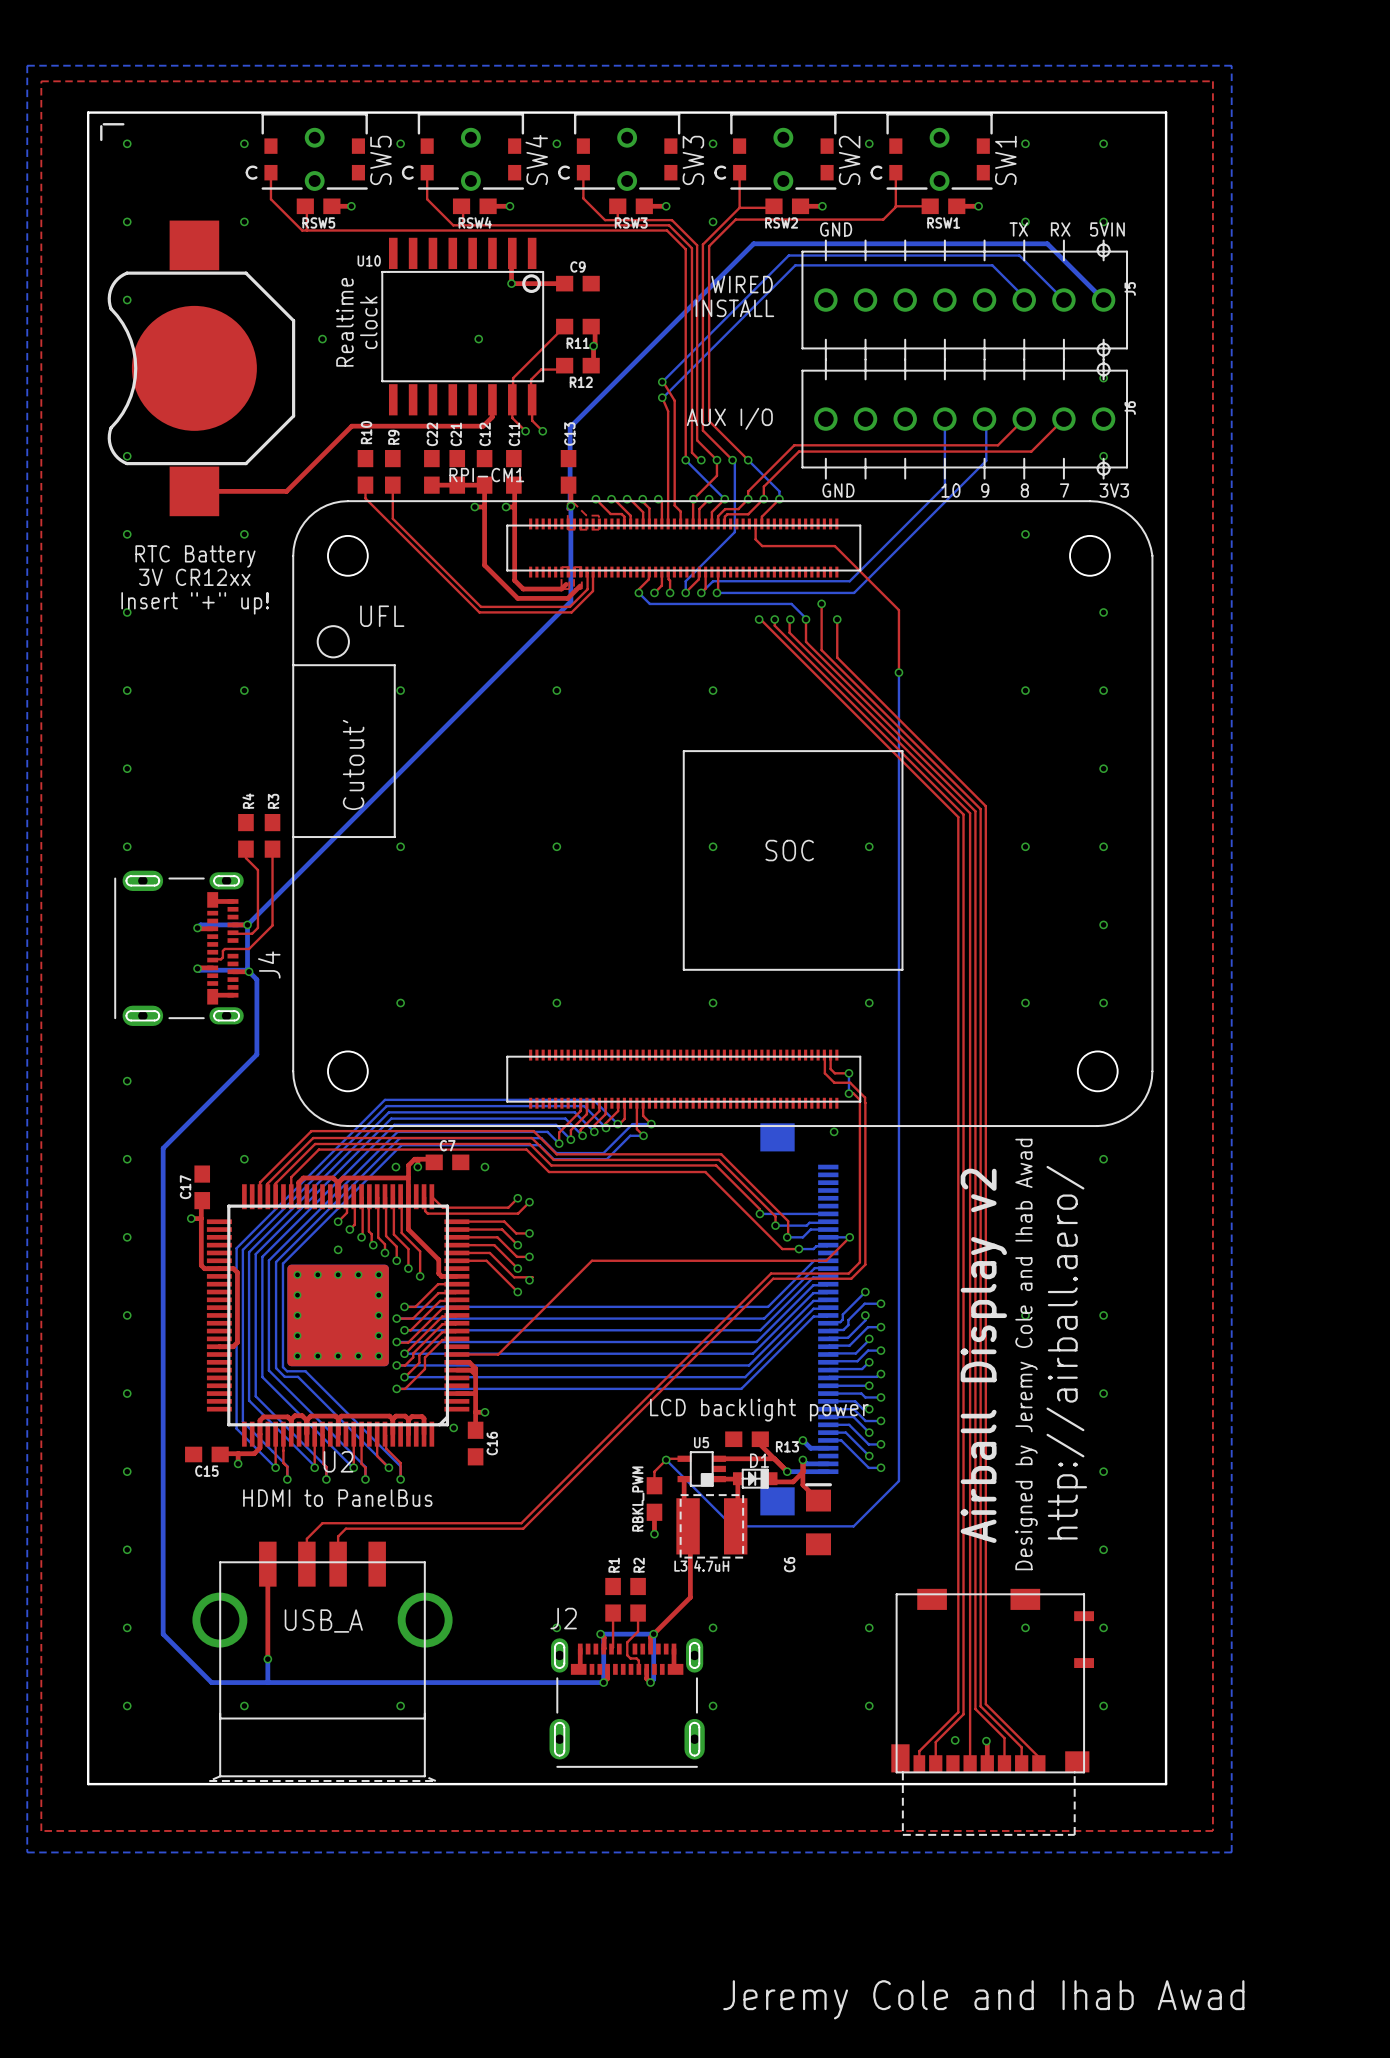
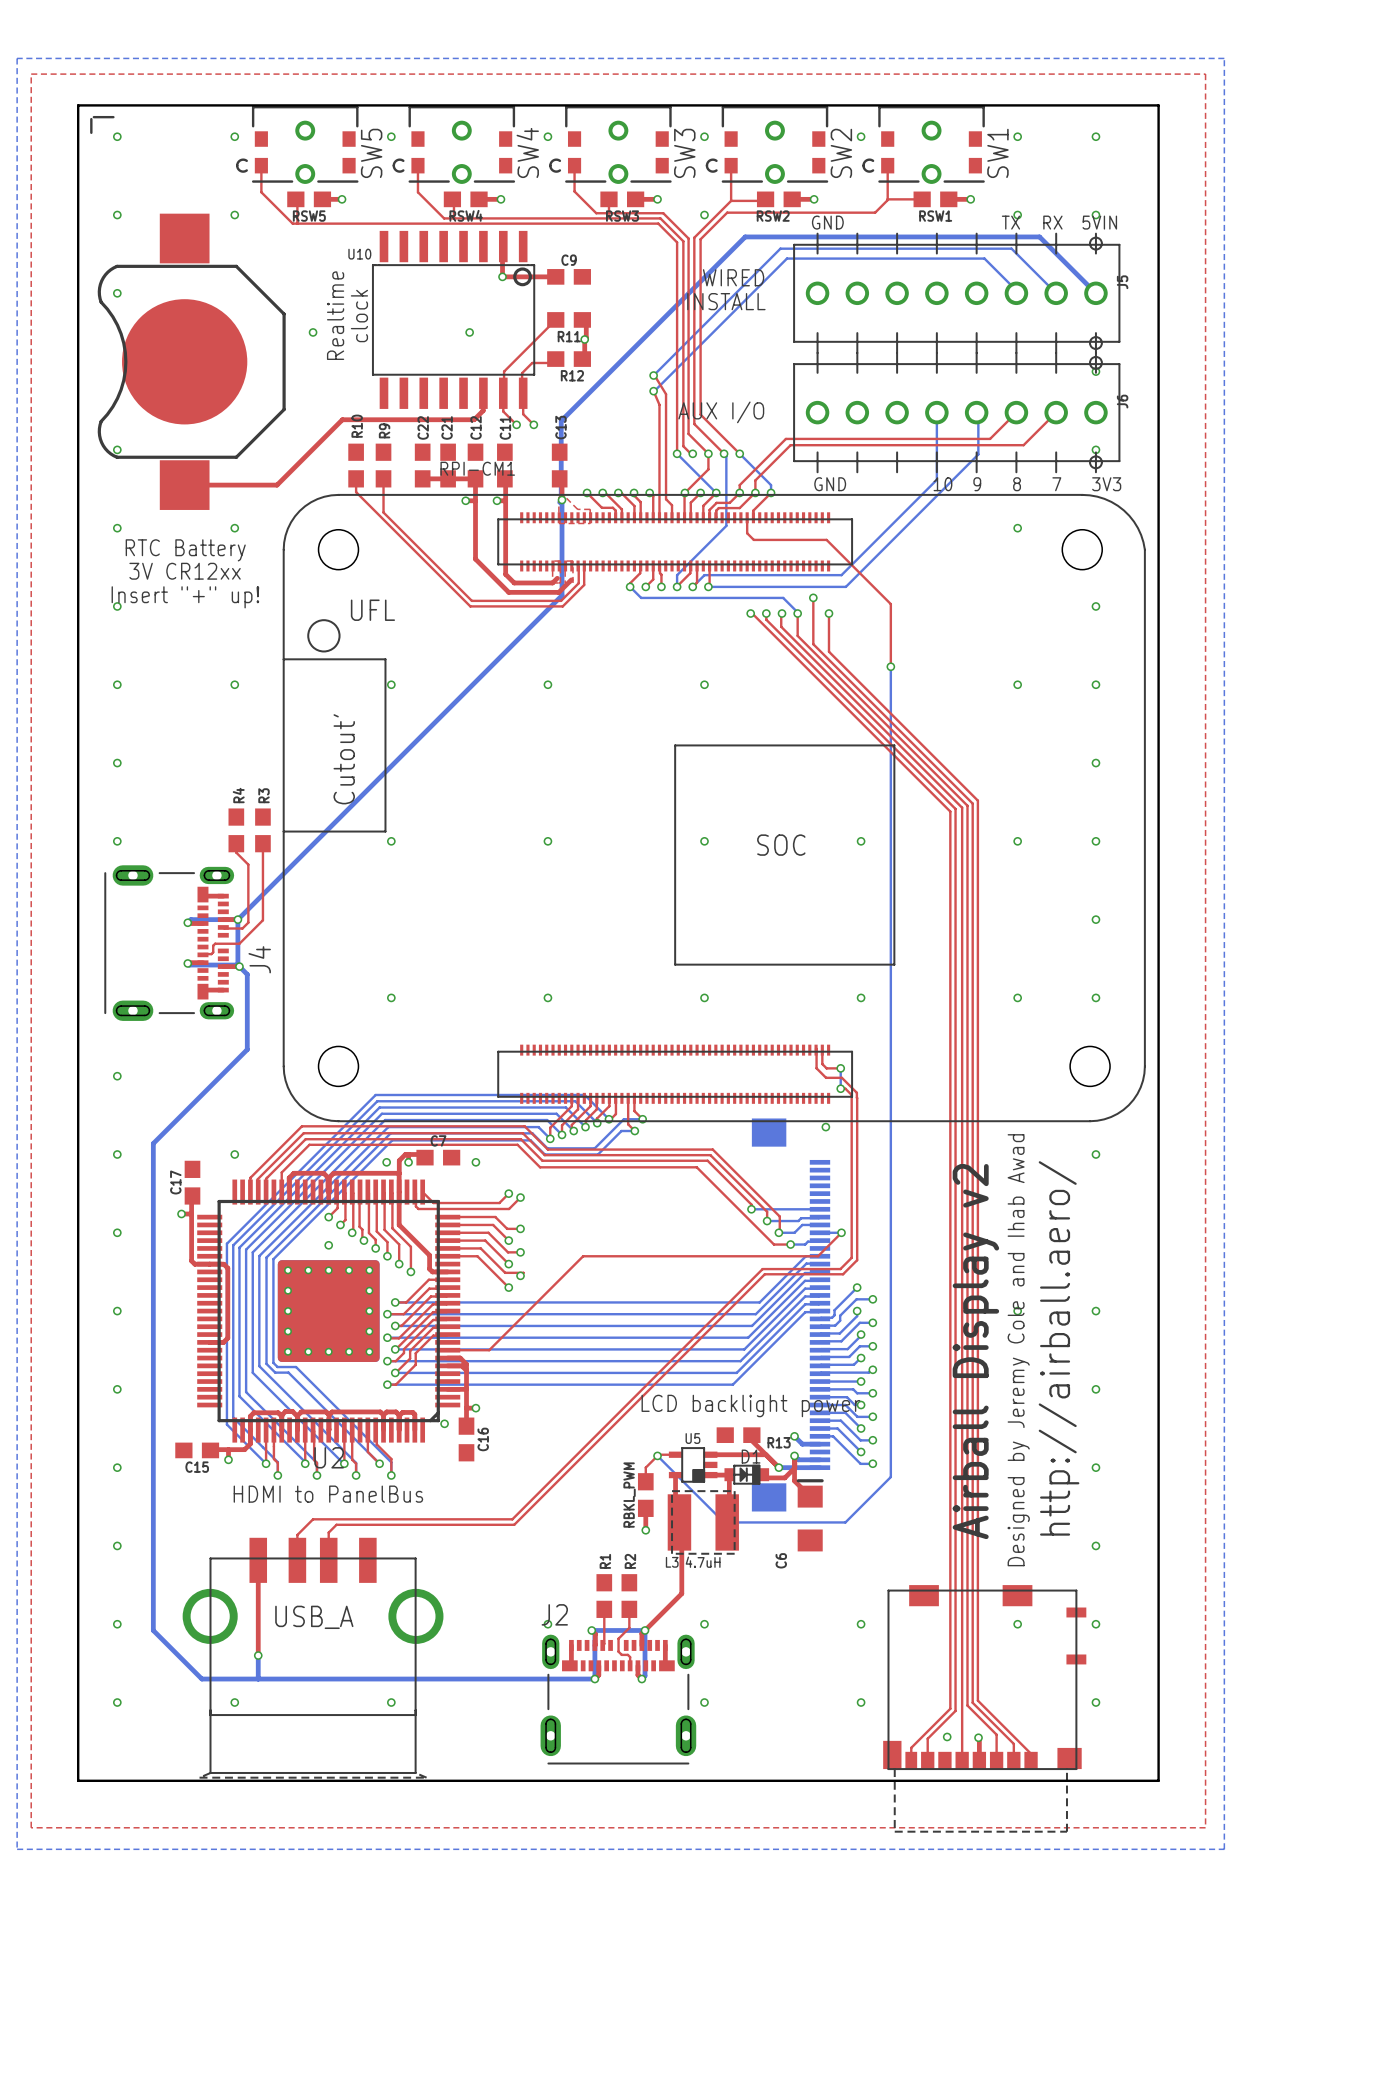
text: Jeremy Cole and Ihab Awad (983, 1999) -> none

